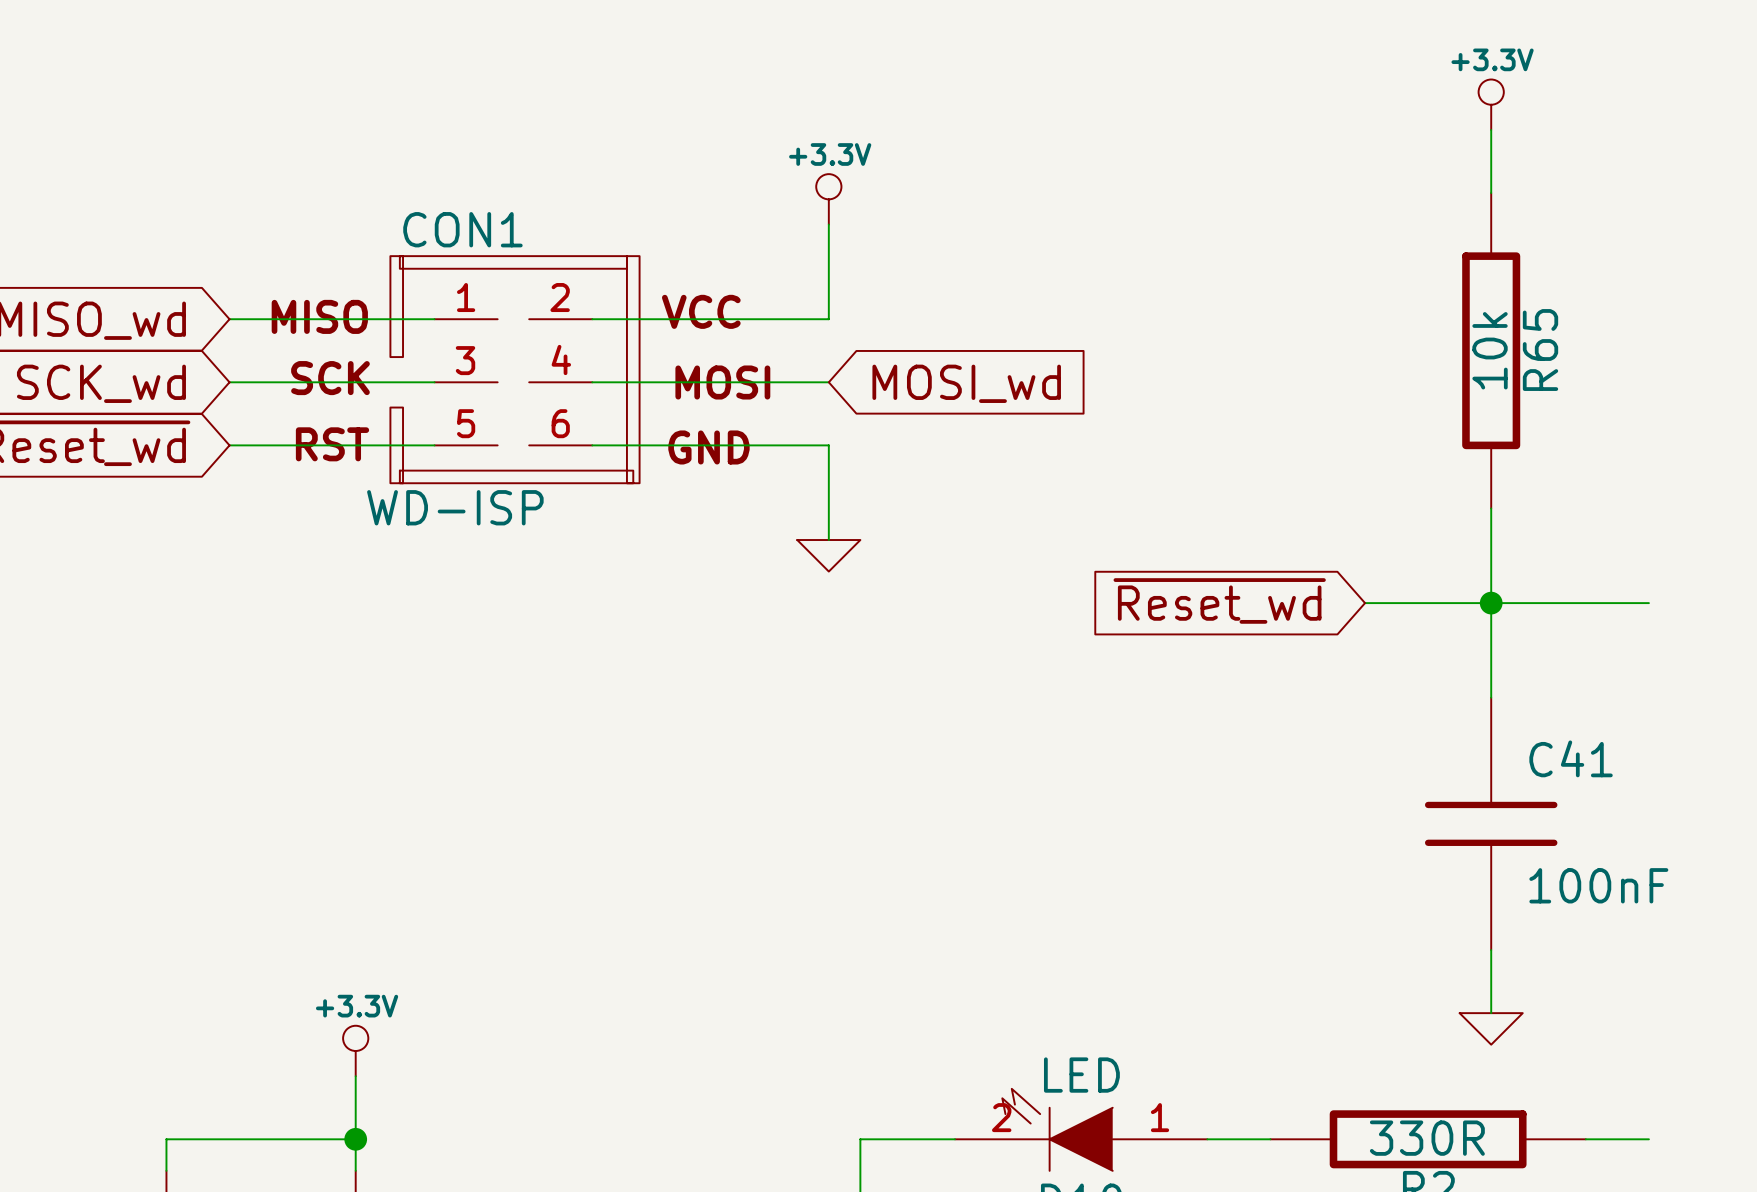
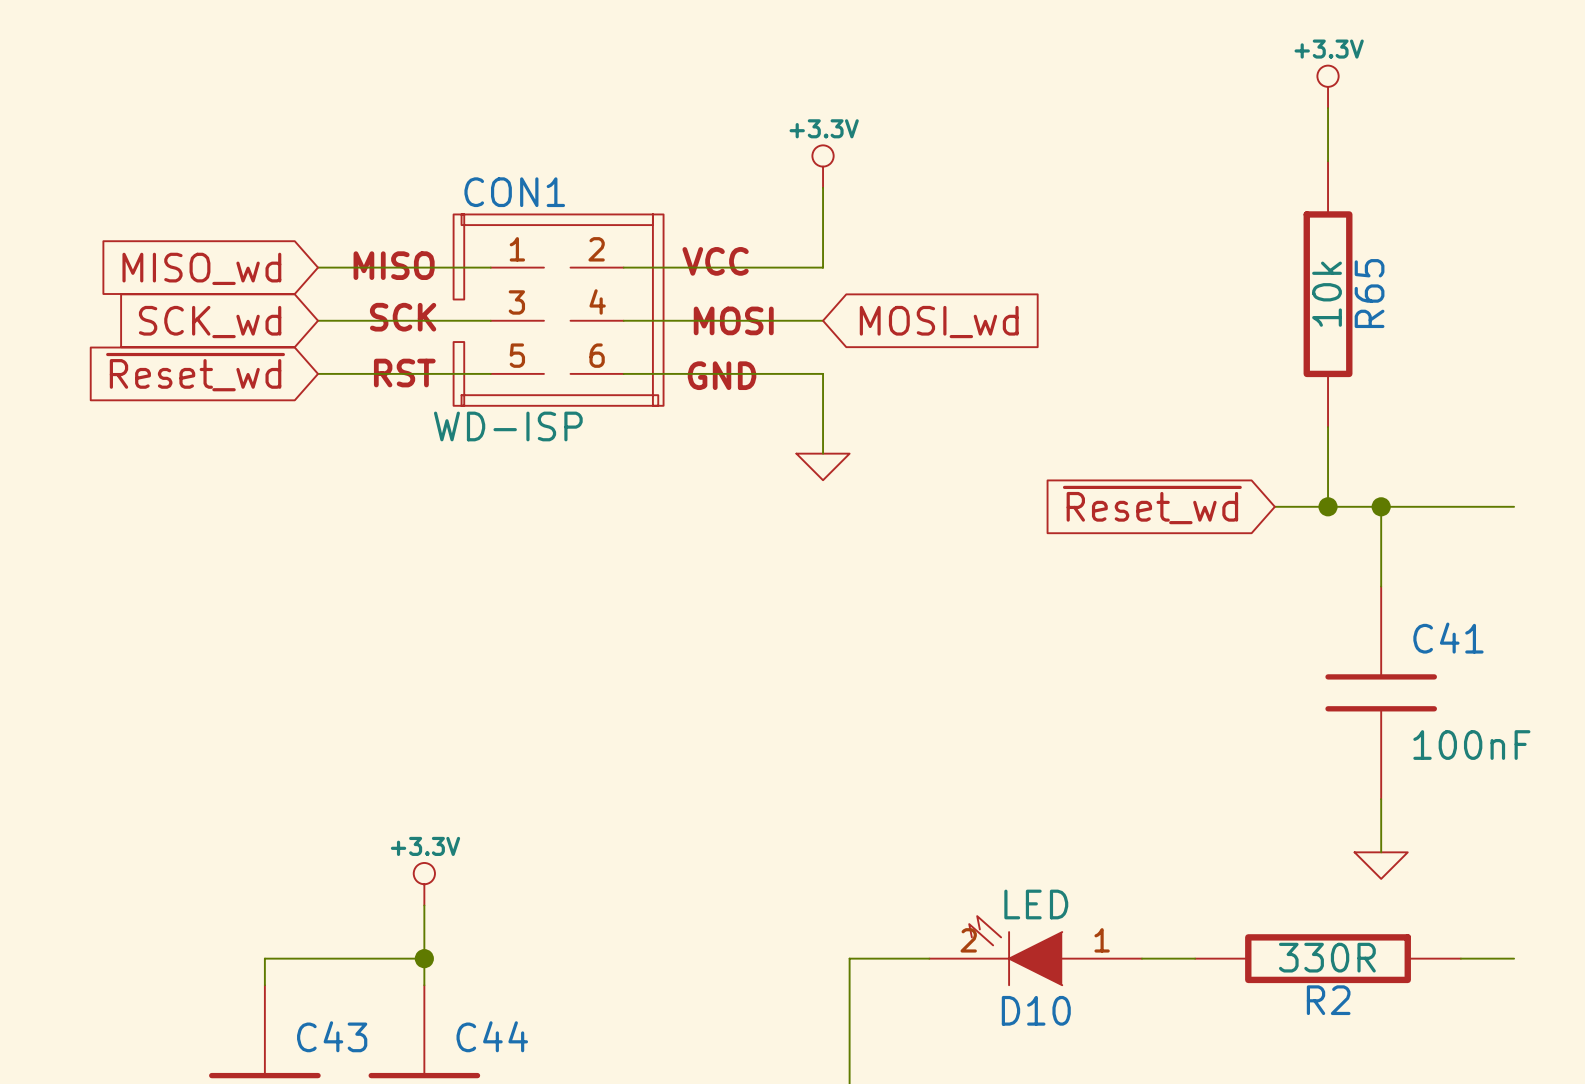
power symbol position: +3.3V (1491, 104) -> +3.3V (1328, 86)
wire: (1491, 129) (1491, 193) -> (1328, 108) (1328, 161)
R65 position: (1491, 350) -> (1328, 294)
wire: (1491, 508) (1491, 603) -> (1328, 427) (1328, 506)
junction: none -> (1328, 506)

